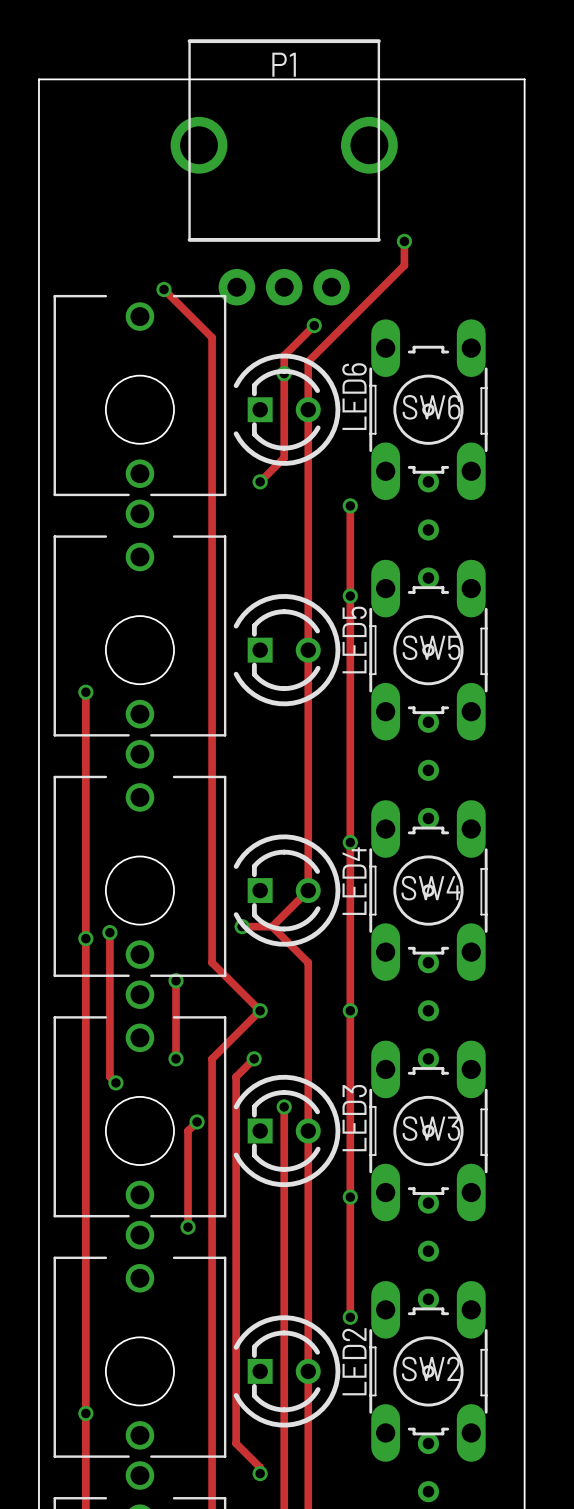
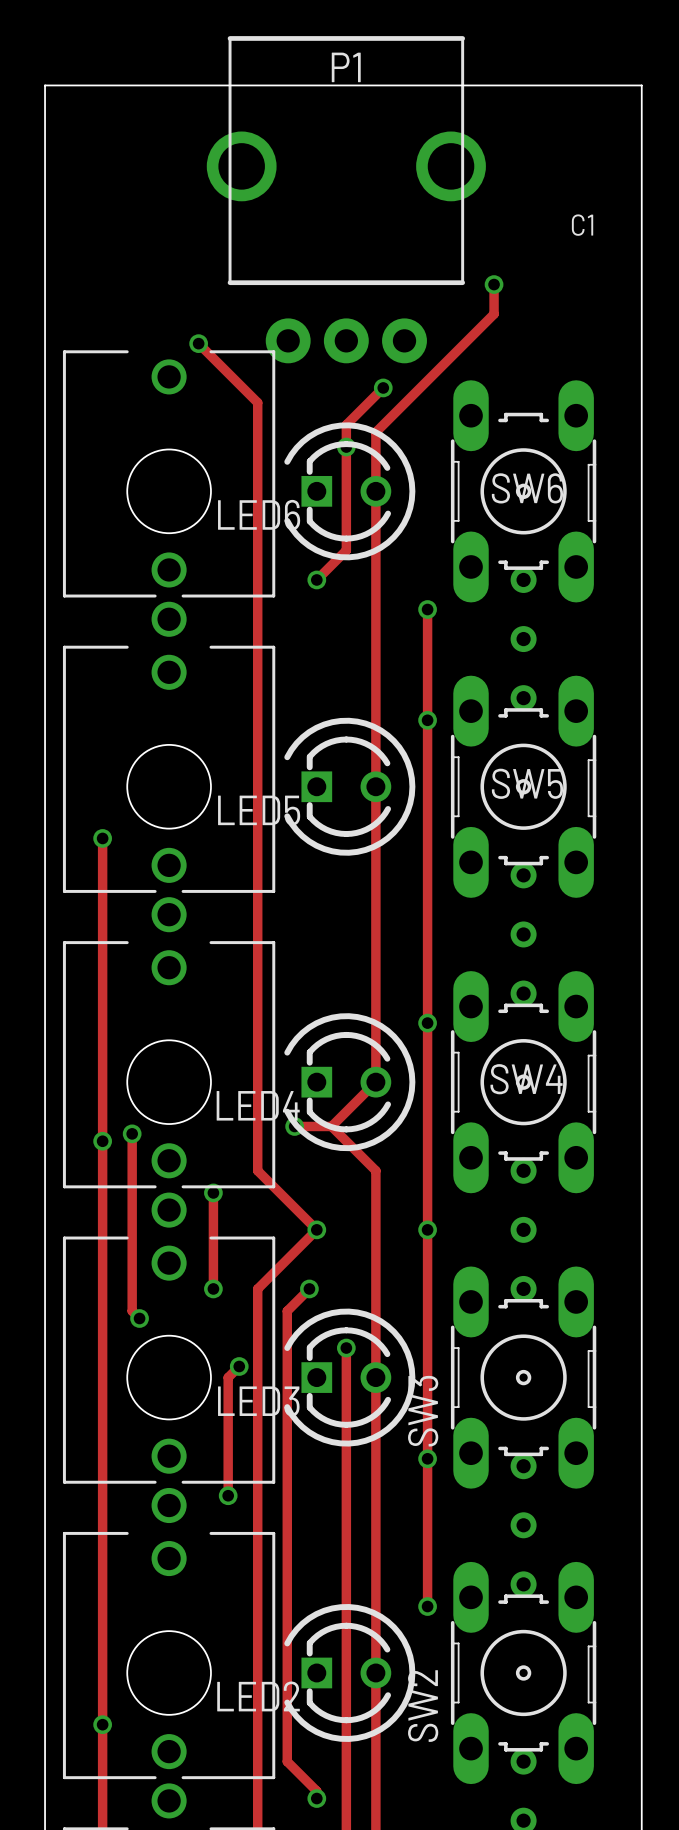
C1: none -> (582, 225)
LED6 name rotation: 0° (354, 396) -> 90° clockwise (259, 514)
LED6 name position: LED6 (354, 396) -> LED6 (259, 514)
LED5 name rotation: 0° (354, 640) -> 90° clockwise (259, 810)
LED5 name position: LED5 (354, 640) -> LED5 (259, 810)
LED4 name rotation: 0° (354, 881) -> 90° clockwise (258, 1105)
LED4 name position: LED4 (354, 881) -> LED4 (258, 1105)
LED3 name rotation: 0° (354, 1118) -> 90° clockwise (258, 1401)
LED3 name position: LED3 (354, 1118) -> LED3 (258, 1401)
SW3 name rotation: 0° (431, 1128) -> 90° counterclockwise (423, 1411)
LED2 name rotation: 0° (354, 1361) -> 90° clockwise (258, 1696)
LED2 name position: LED2 (354, 1361) -> LED2 (258, 1696)
SW2 name rotation: 0° (431, 1369) -> 90° counterclockwise (423, 1706)

